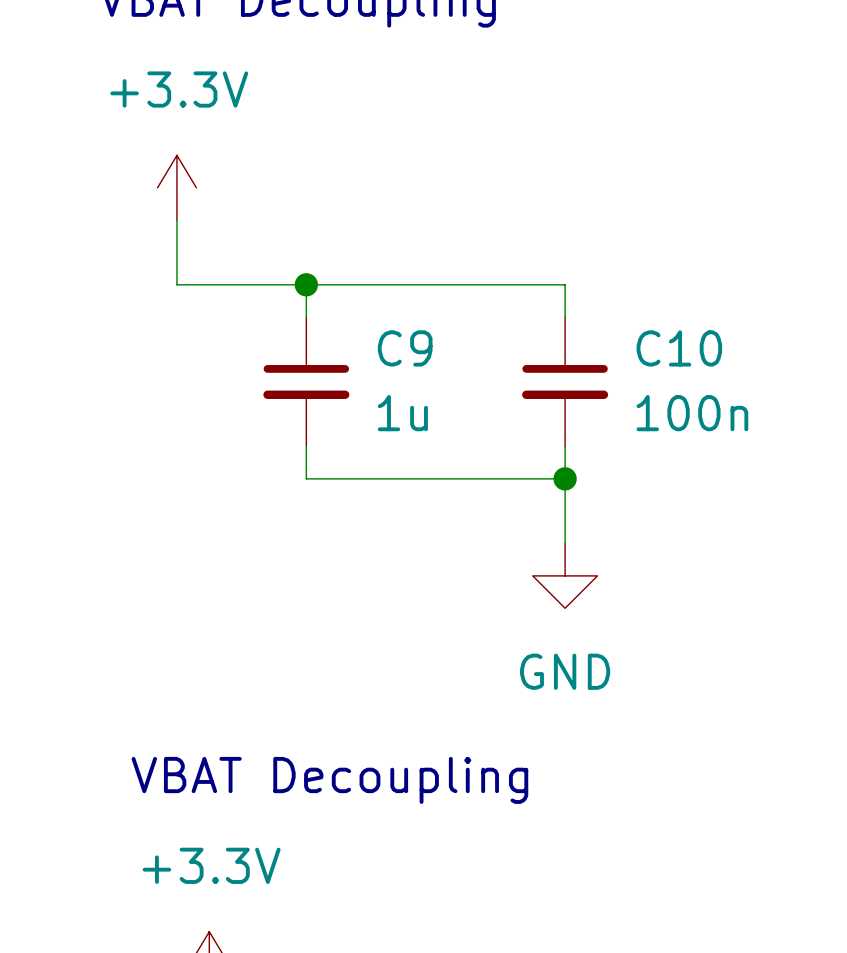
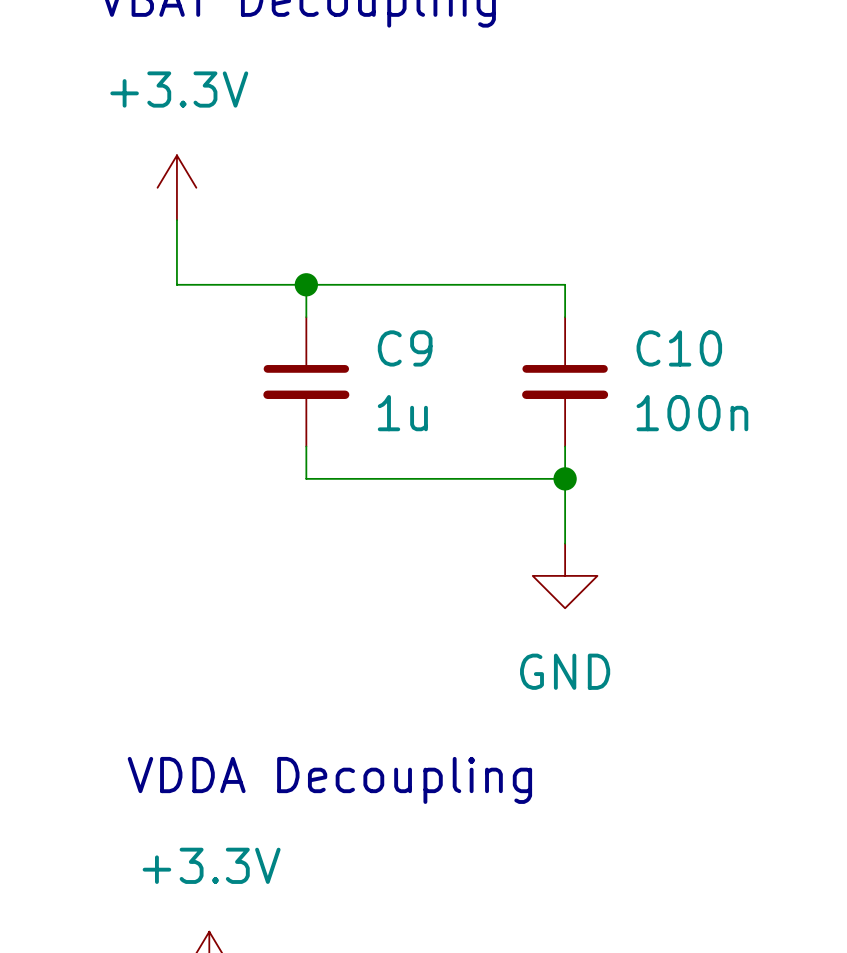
text: VBAT Decoupling (329, 780) -> VDDA Decoupling (329, 780)

